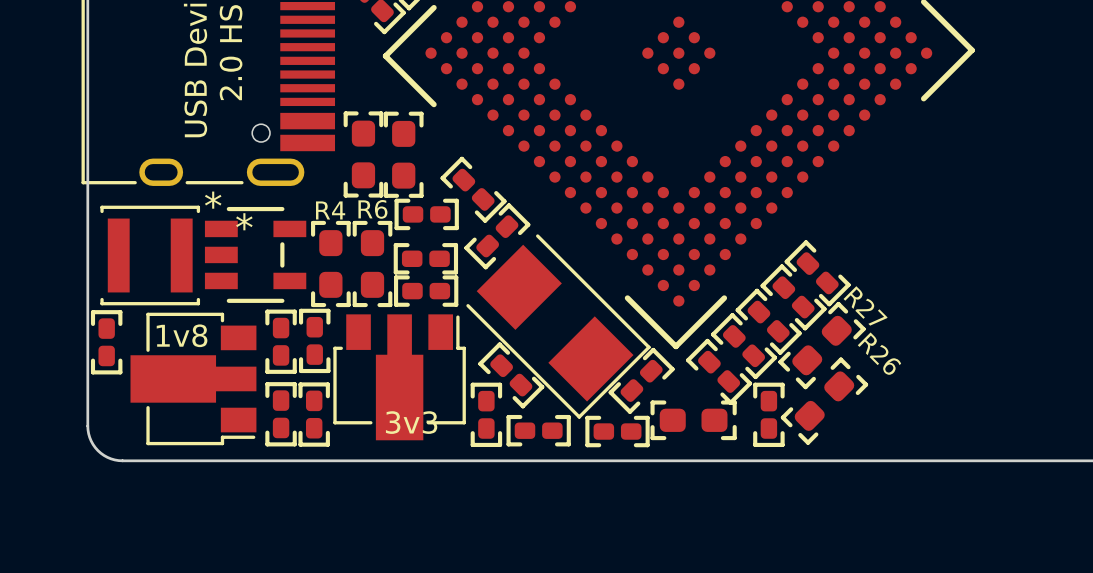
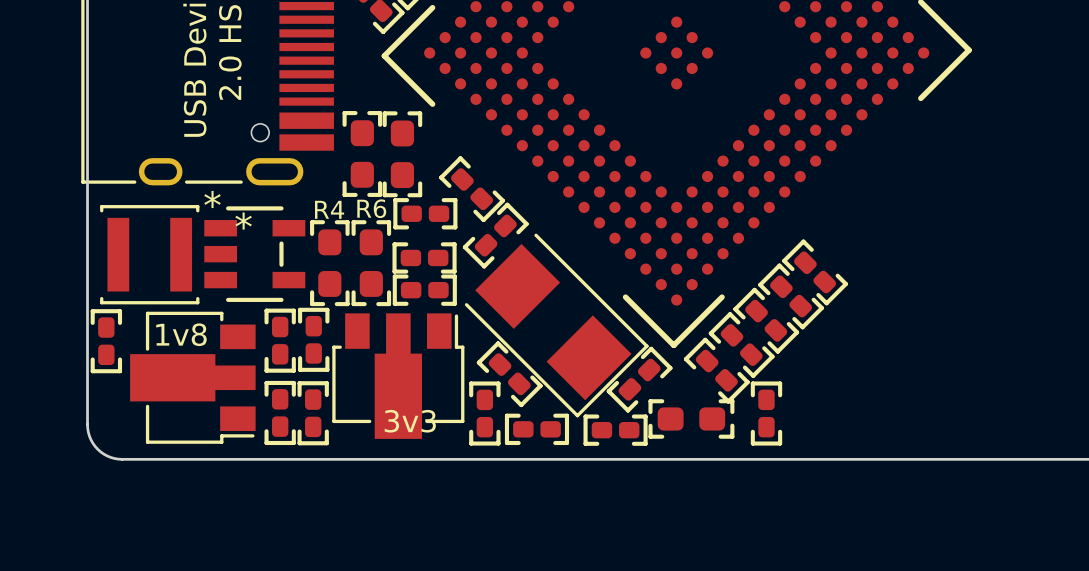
R27: (822, 345) -> none
R26: (824, 401) -> none

